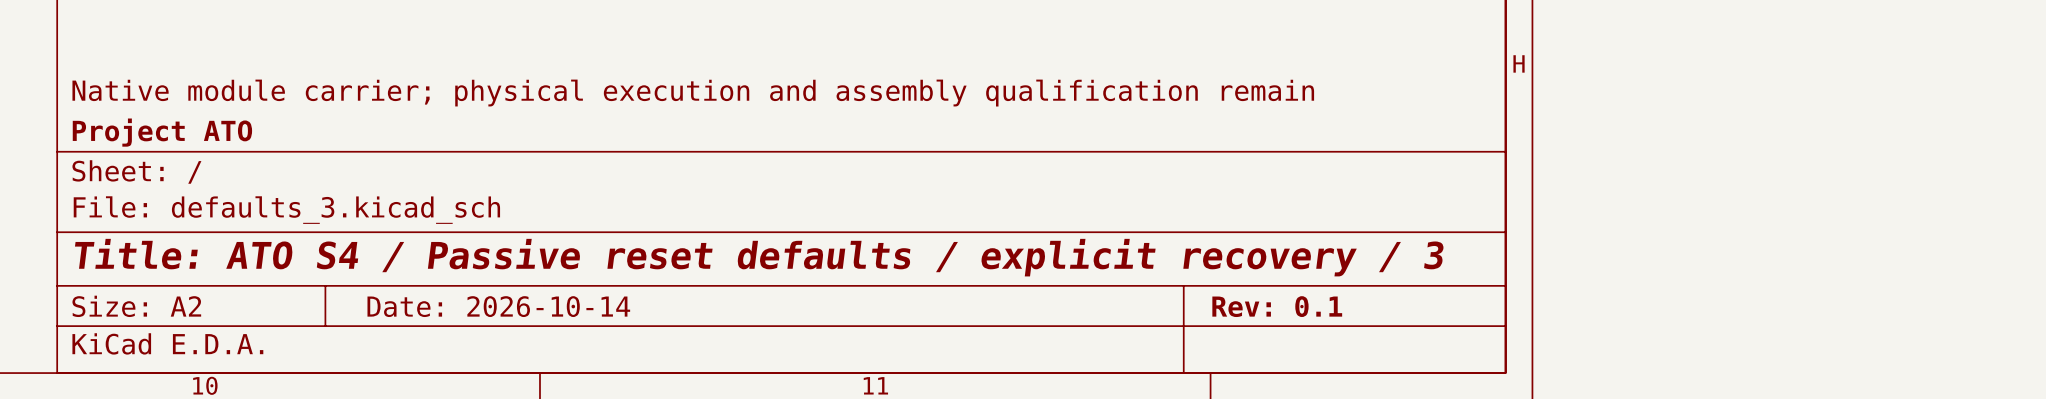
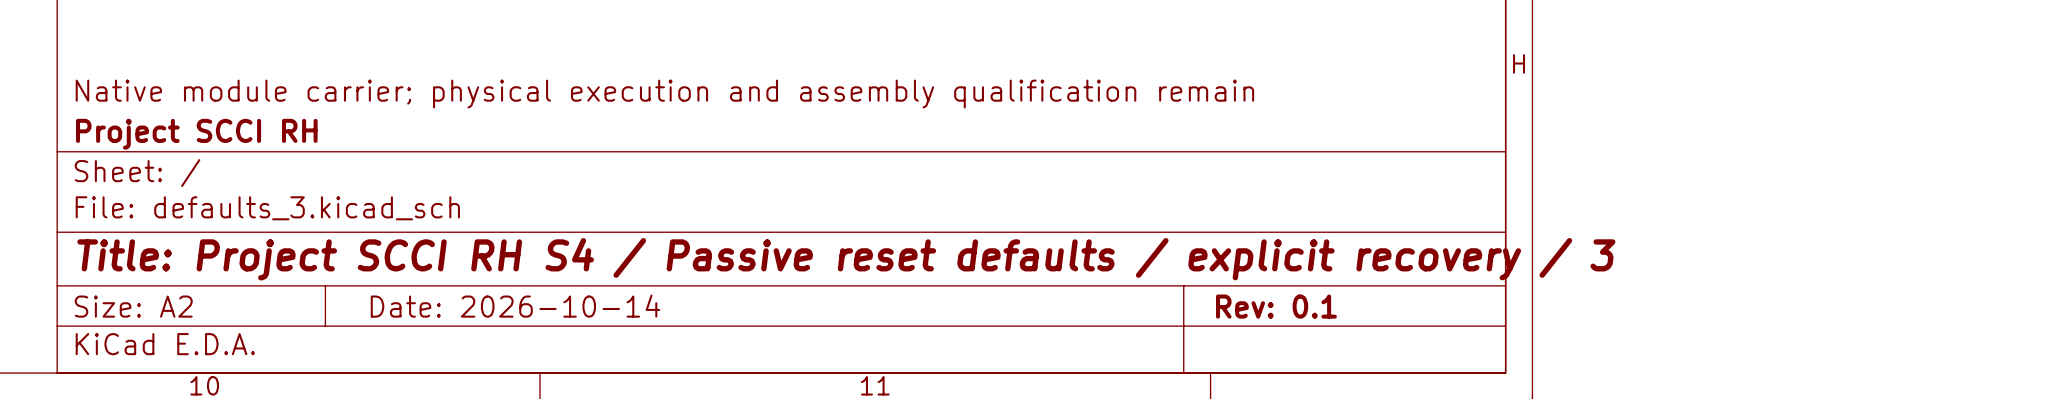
title block: Project ATO (162, 132) -> Project SCCI RH (196, 134)
title block: Title: ATO S4 / Passive reset defaults / explicit recovery / 3 (759, 257) -> Title: Project SCCI RH S4 / Passive reset defaults / explicit recovery / 3 (846, 259)

